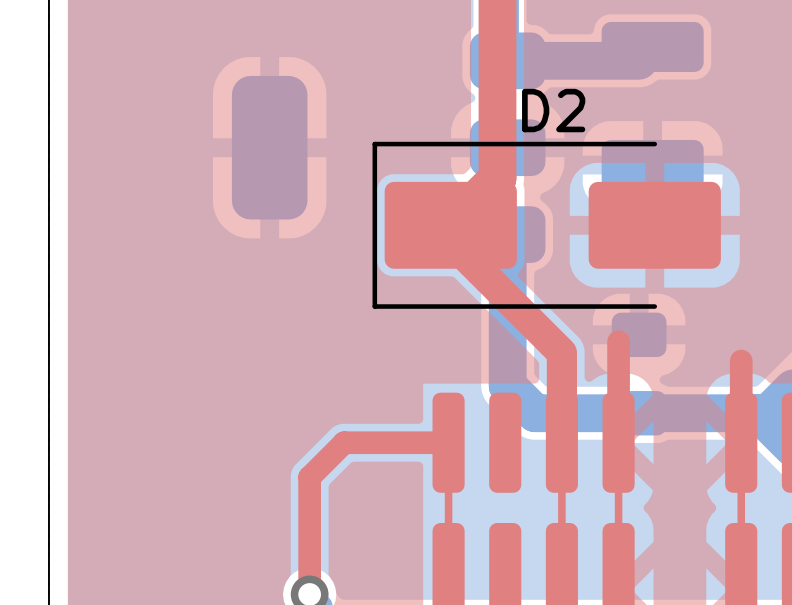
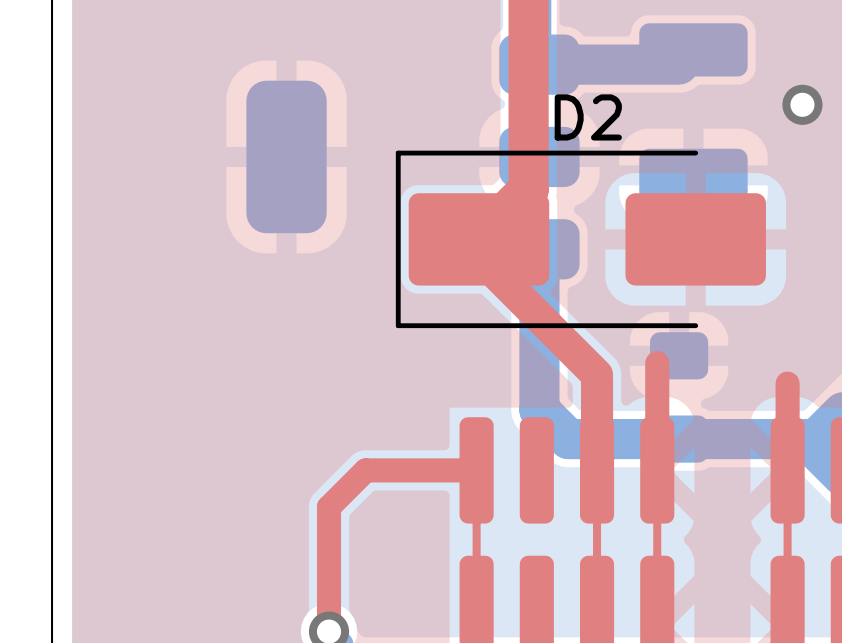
via: none -> (802, 104)

